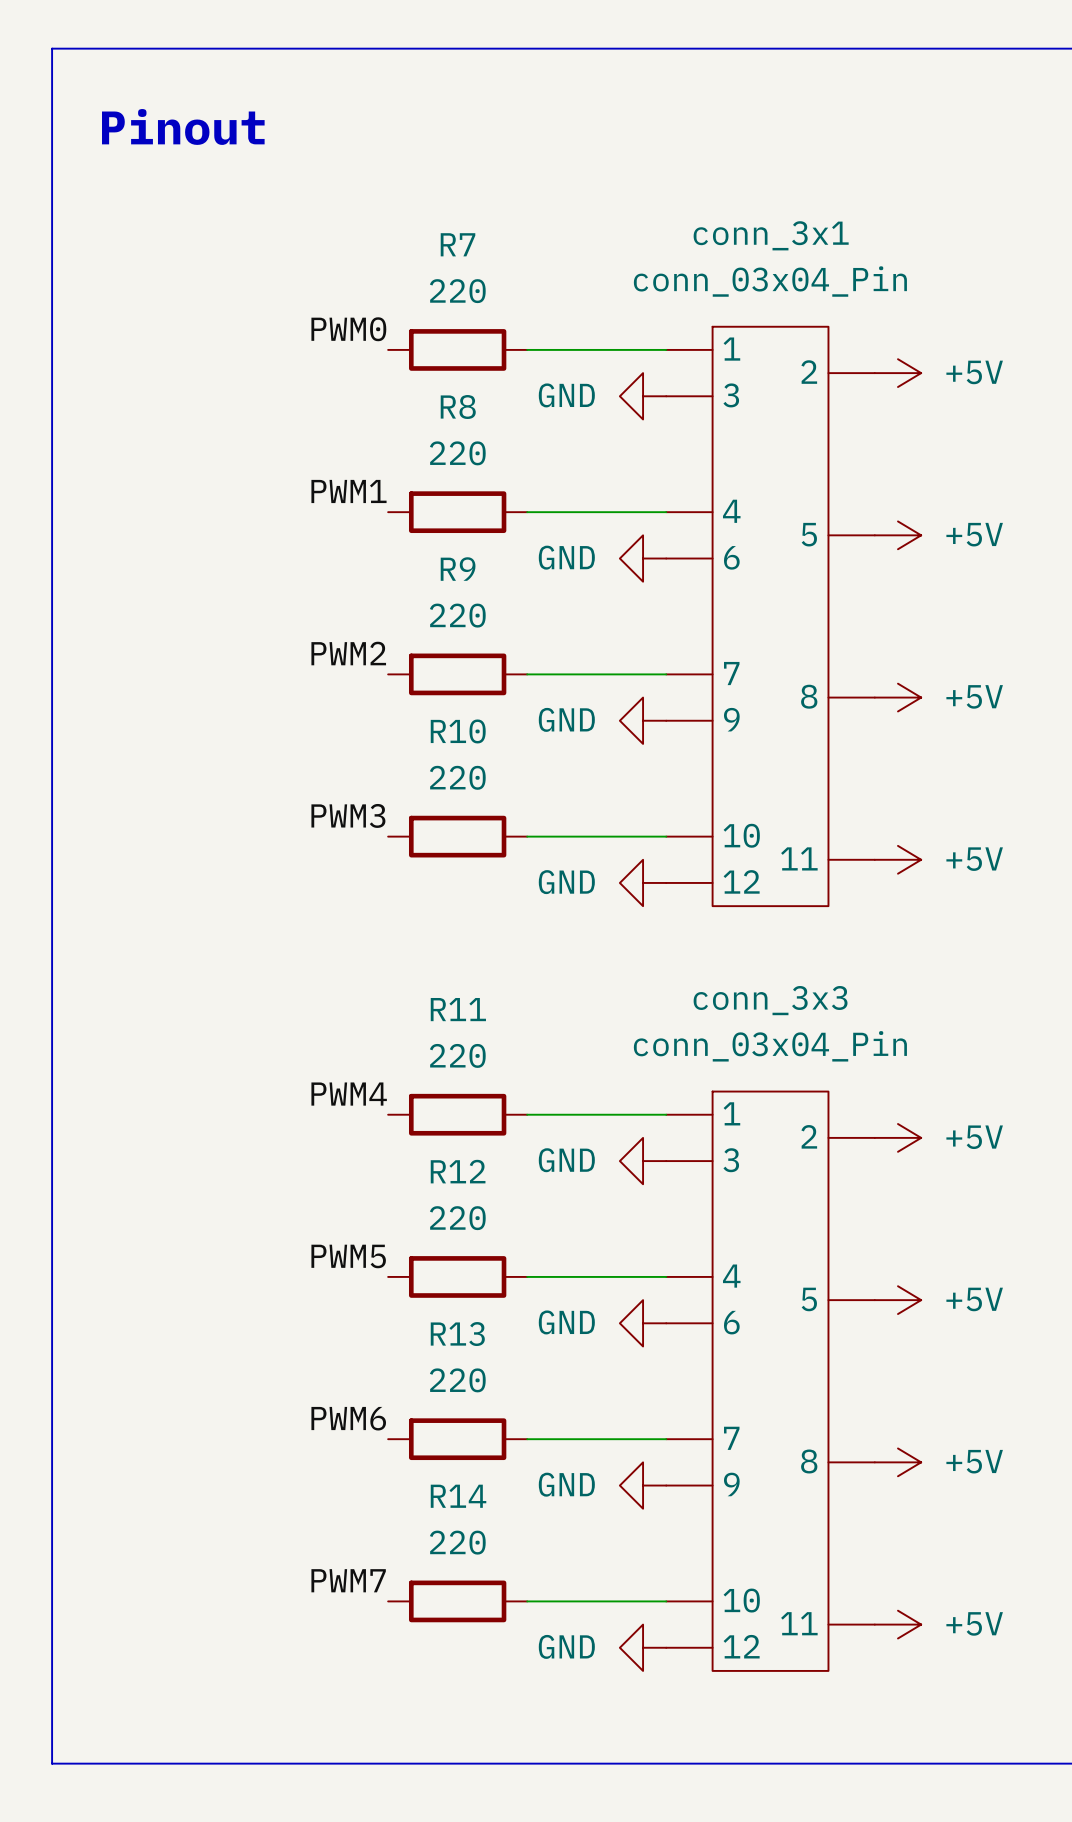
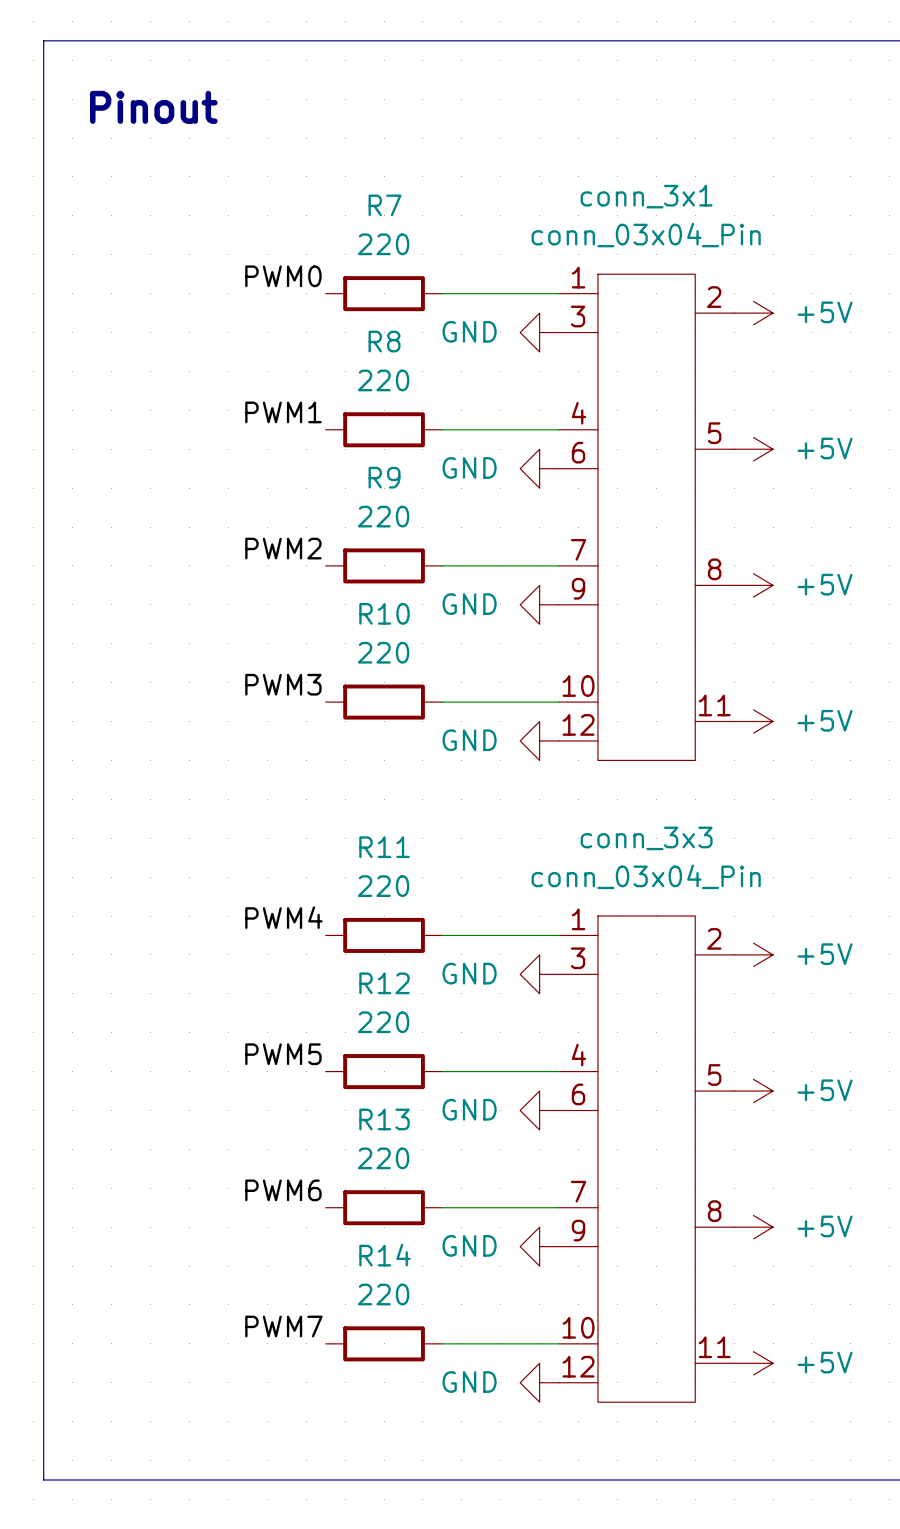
conn_3x1 symbol: [666, 326, 875, 907] -> [559, 274, 735, 761]
conn_3x3 symbol: [666, 1091, 875, 1671] -> [559, 916, 735, 1403]

